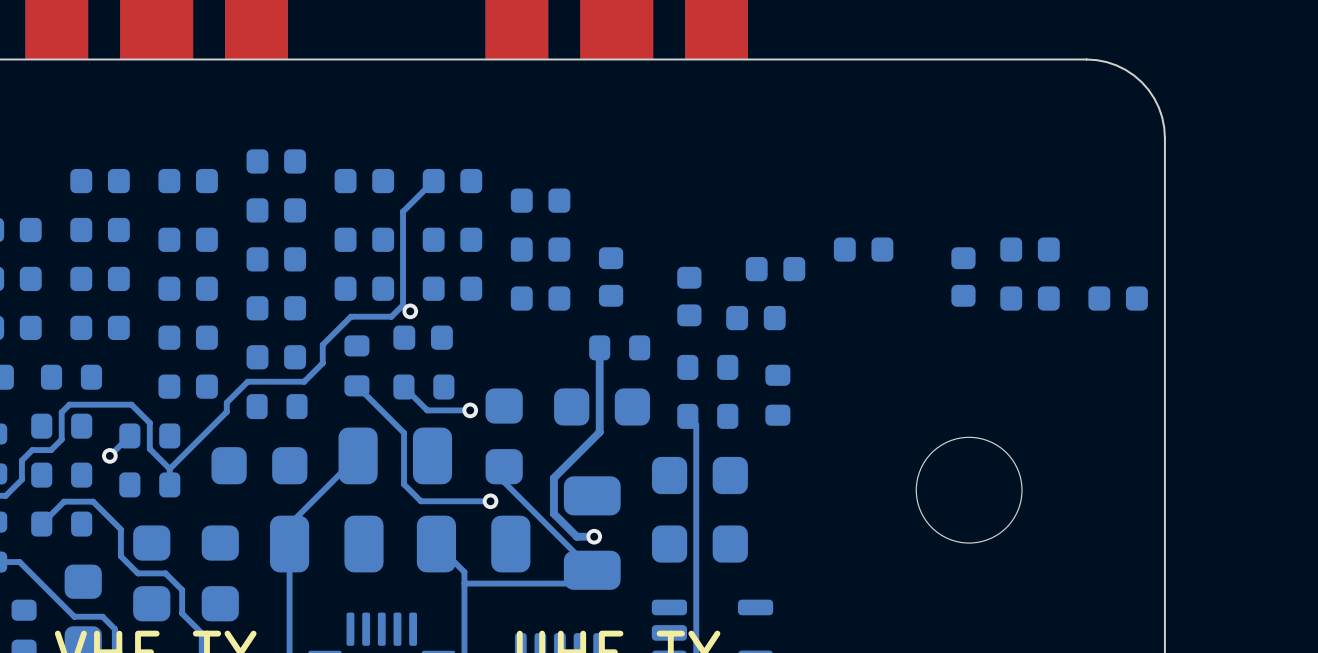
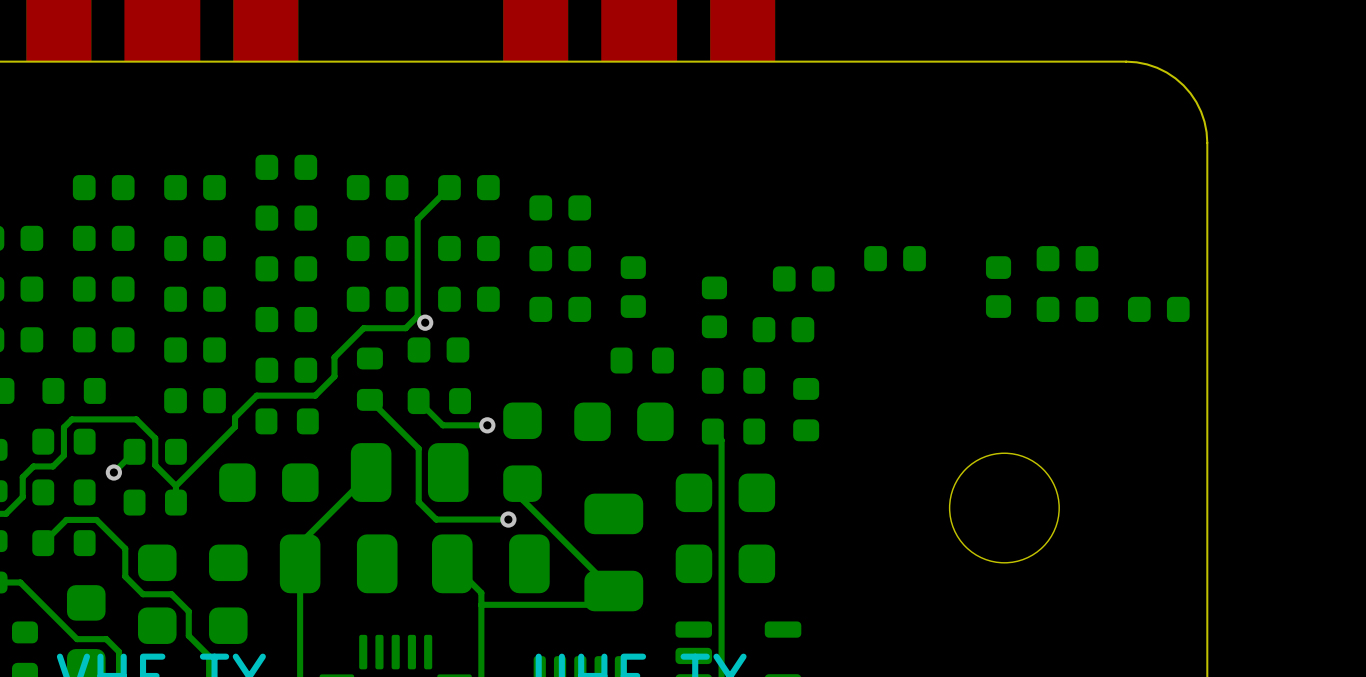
bottom track: (599, 347) (599, 432) (553, 477) (553, 513) (576, 536) (594, 536) -> none
via: (594, 536) -> none

